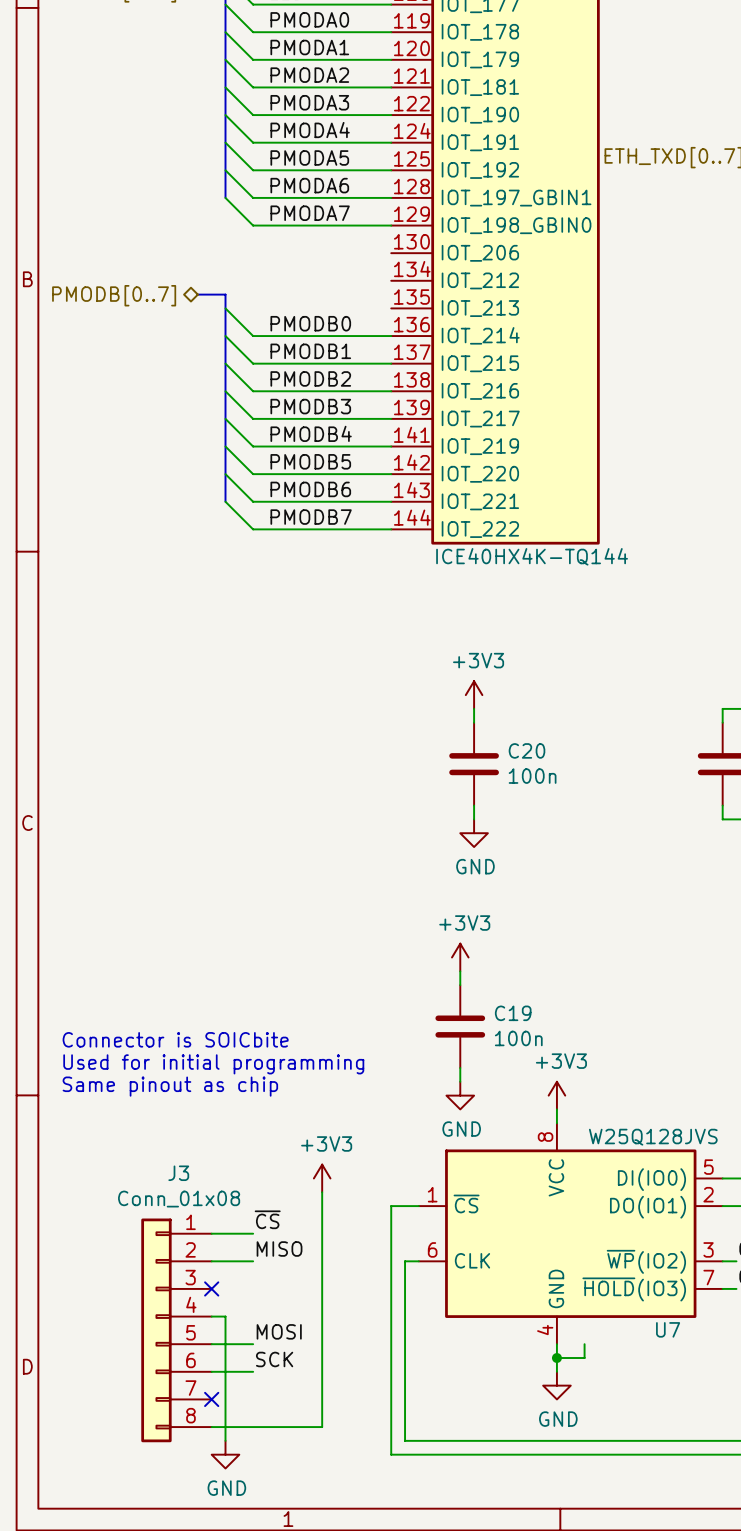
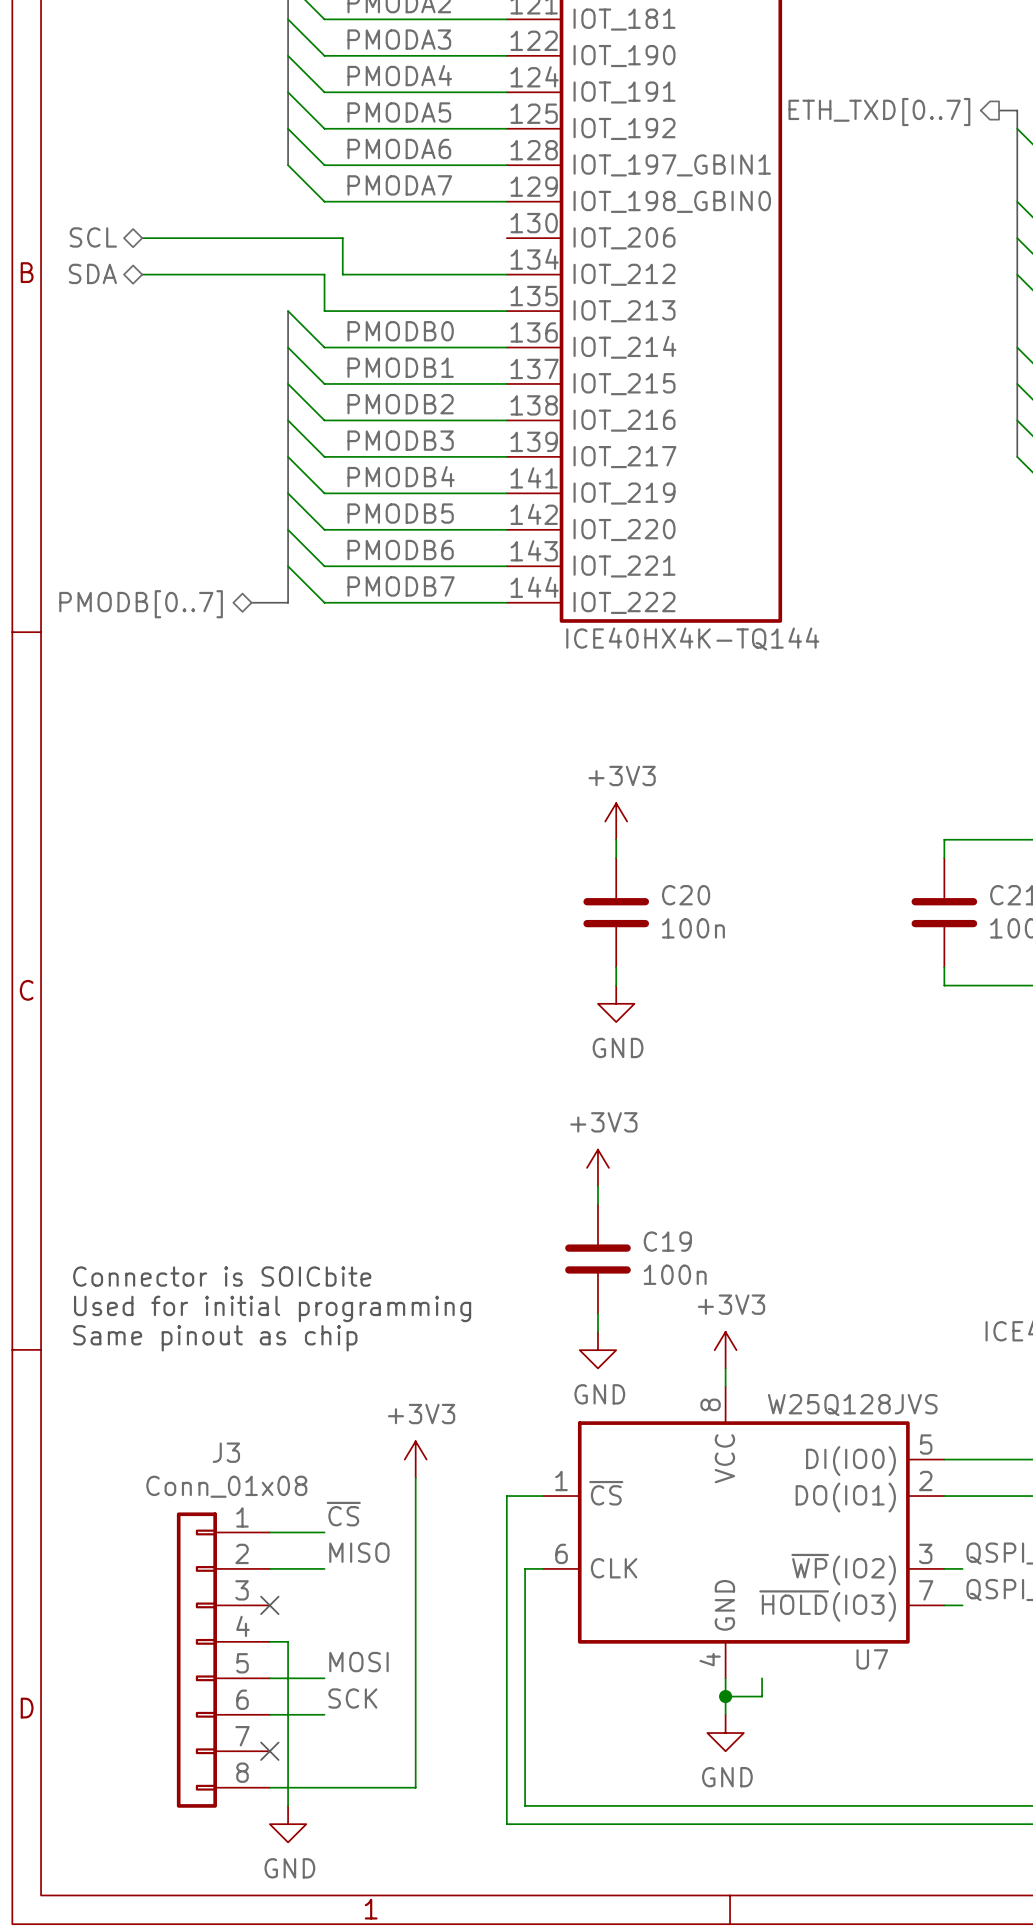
hierarchical label: none -> SCL (93, 237)
wire: none -> (142, 238) (342, 238) (342, 274) (506, 274)
hierarchical label: none -> SDA (92, 273)
wire: none -> (142, 274) (324, 274) (324, 311) (506, 311)
bus: (197, 294) (225, 294) (225, 308) -> none
hierarchical label position: PMODB[0..7] (114, 295) -> PMODB[0..7] (141, 604)
bus: none -> (288, 566) (288, 602) (251, 602)

